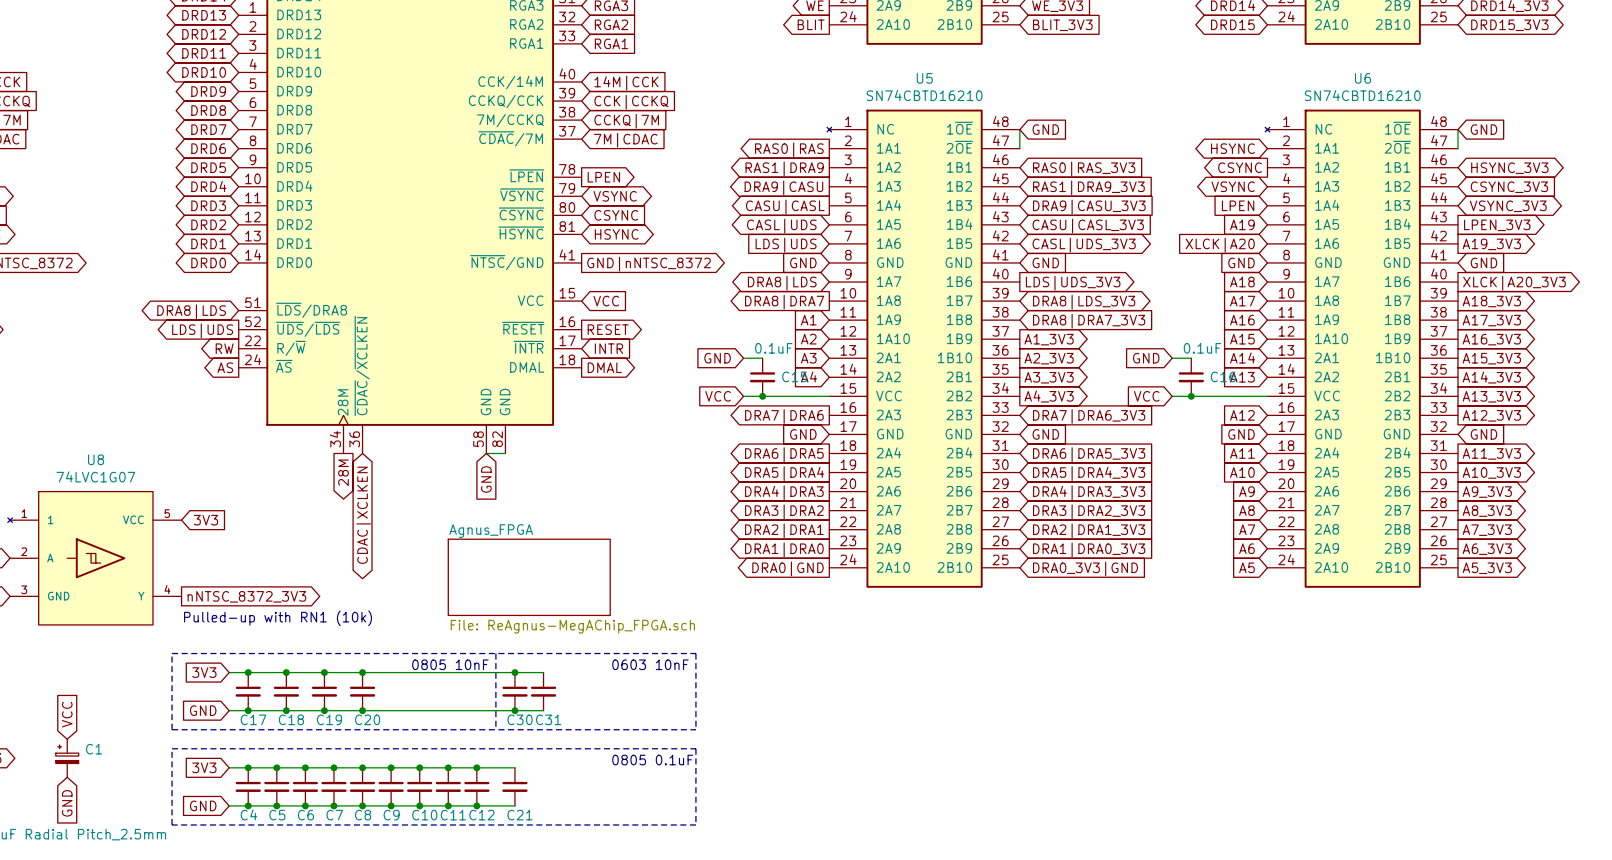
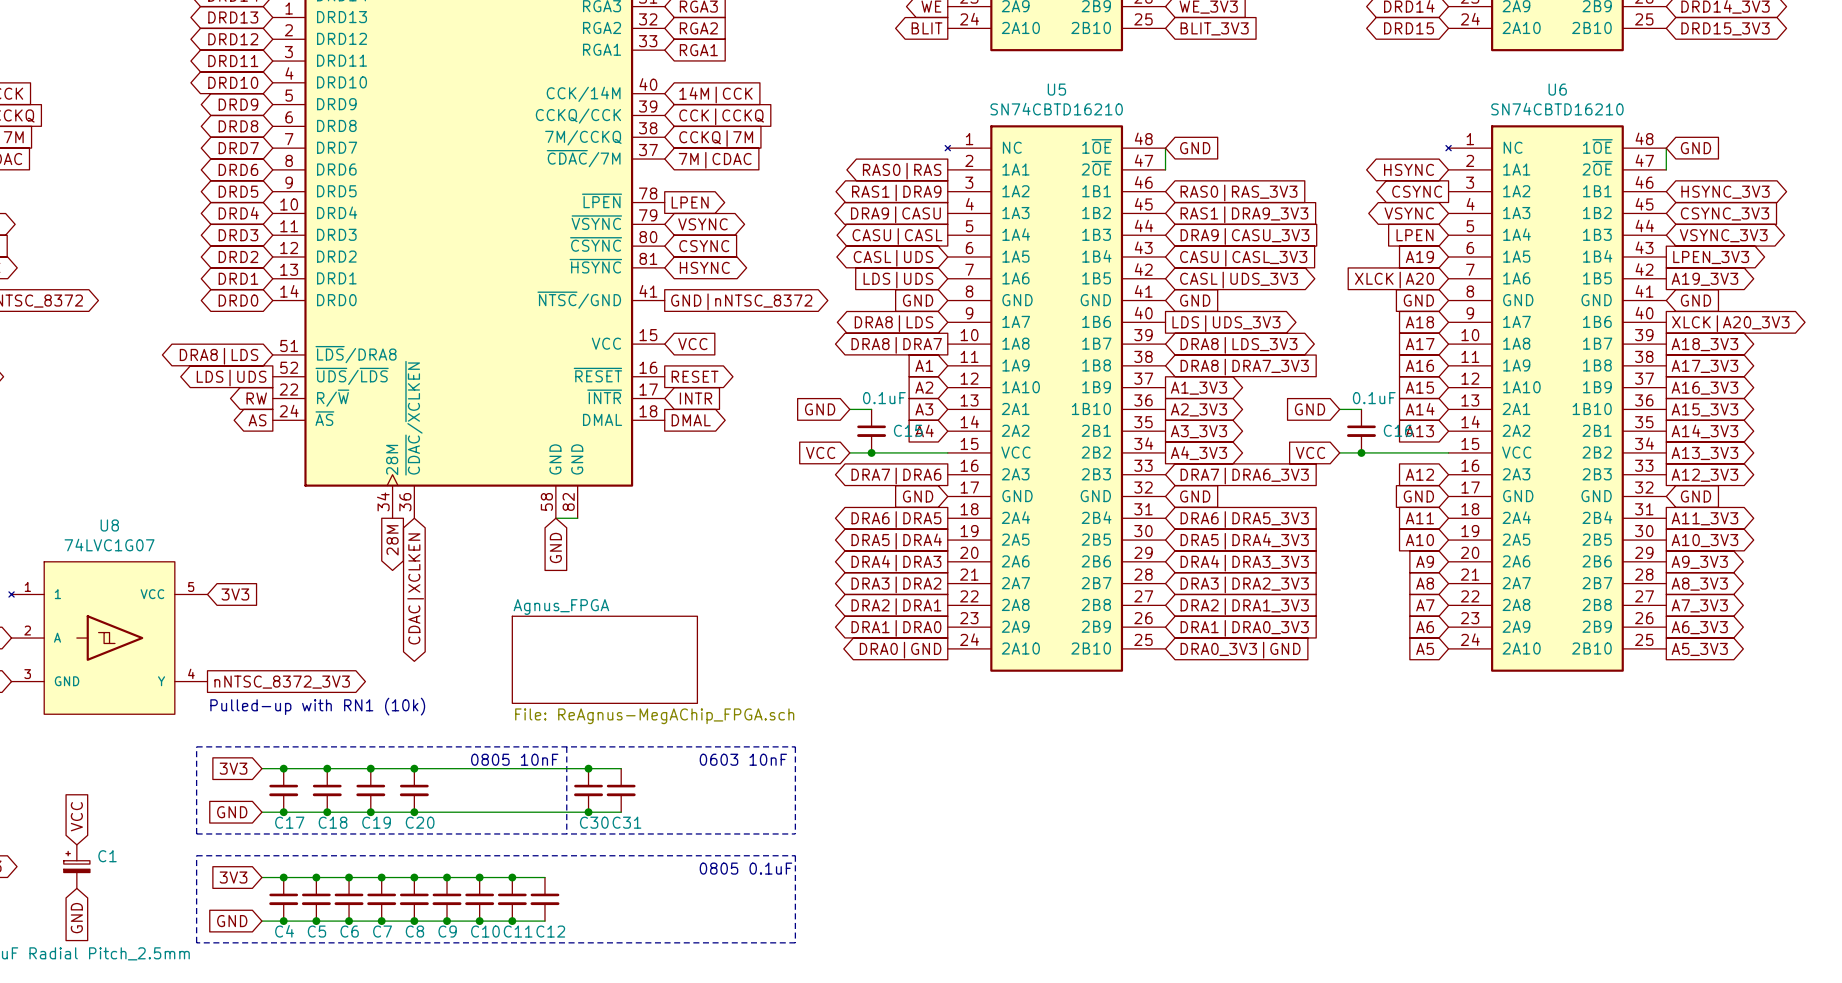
wire: (476, 767) (514, 767) -> none
junction: (476, 767) -> none
C21: (514, 786) -> none
wire: (476, 805) (514, 805) -> none
junction: (476, 805) -> none

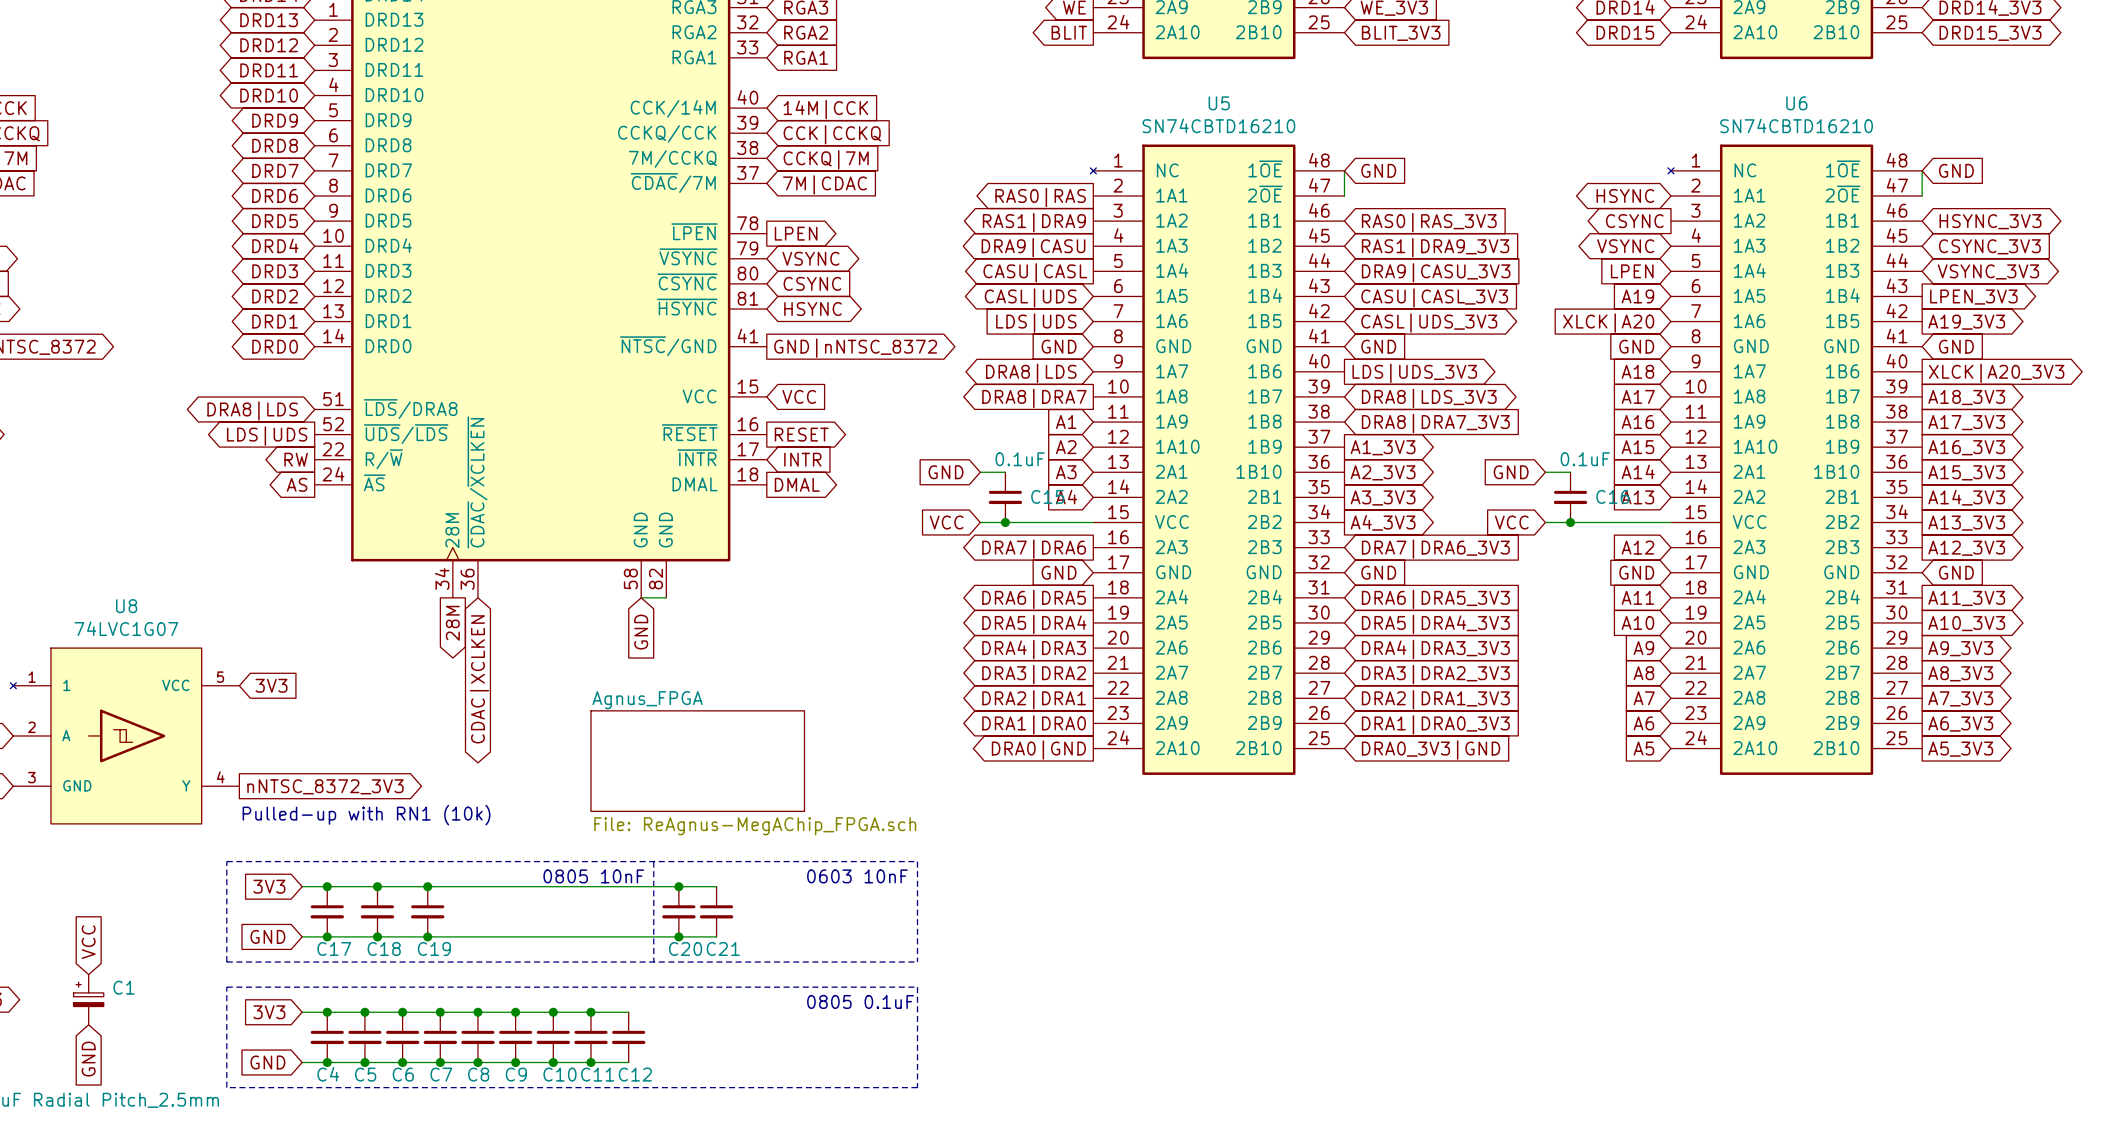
junction: (414, 768) -> none
C20: (414, 790) -> none
junction: (414, 812) -> none
C30 name: C30 (594, 822) -> C20 (685, 949)
C31 name: C31 (626, 822) -> C21 (723, 949)

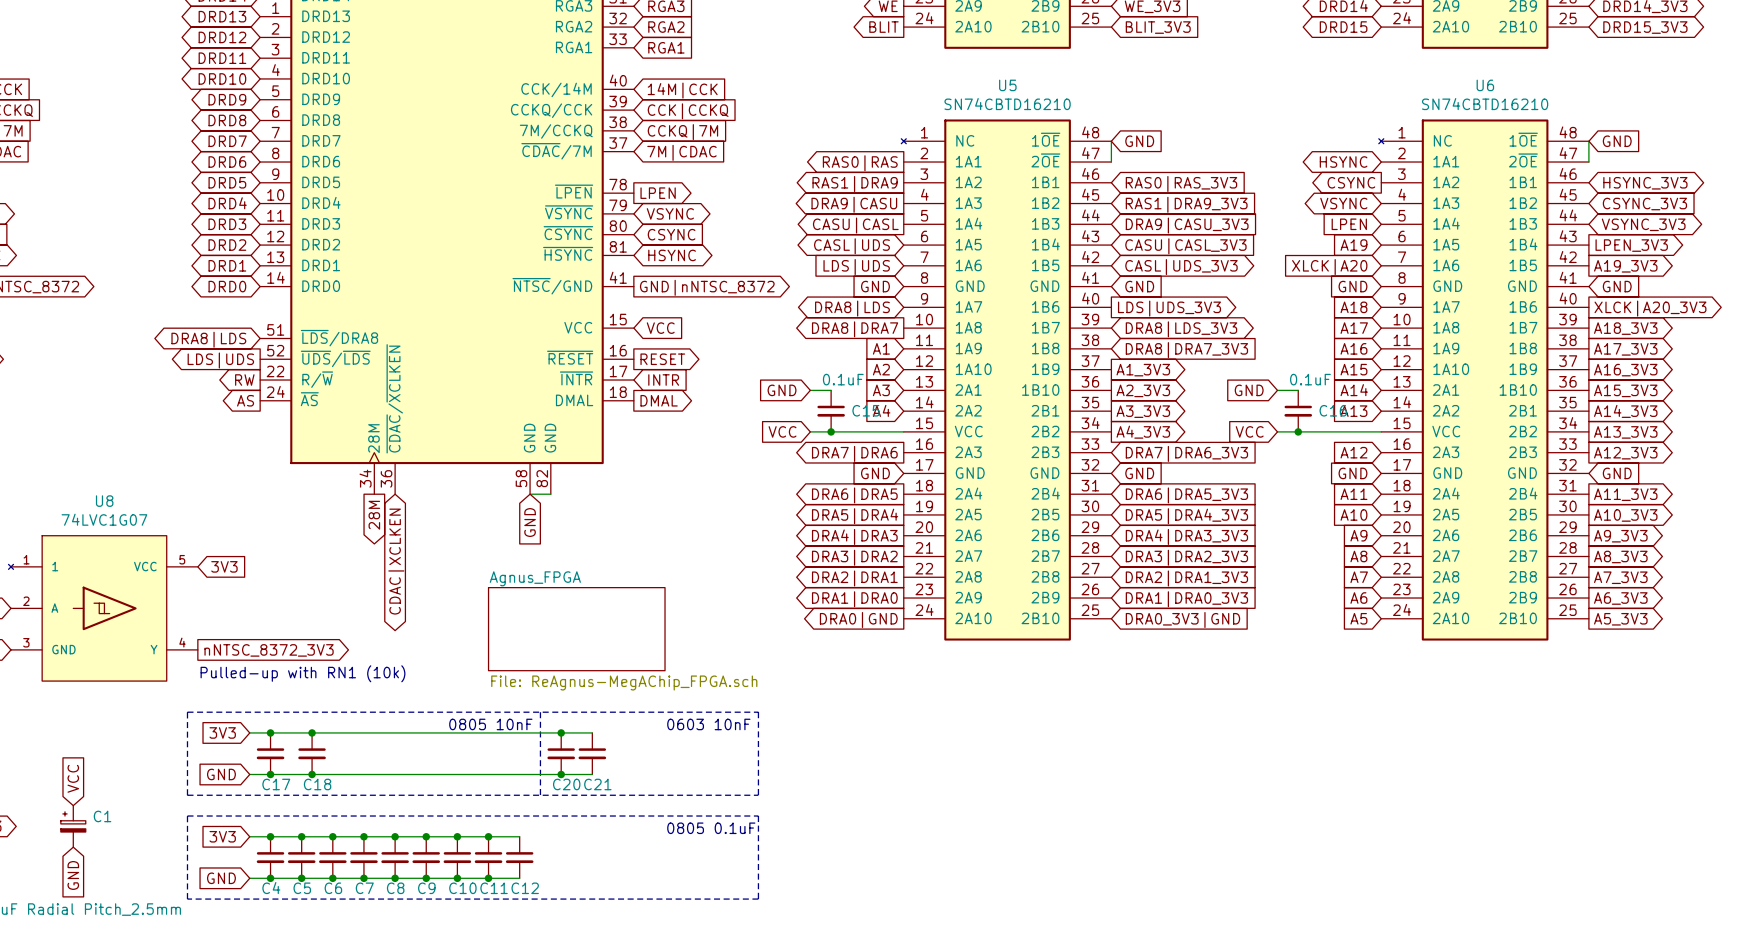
junction: (427, 886) -> none
C19: (427, 911) -> none
junction: (427, 936) -> none

